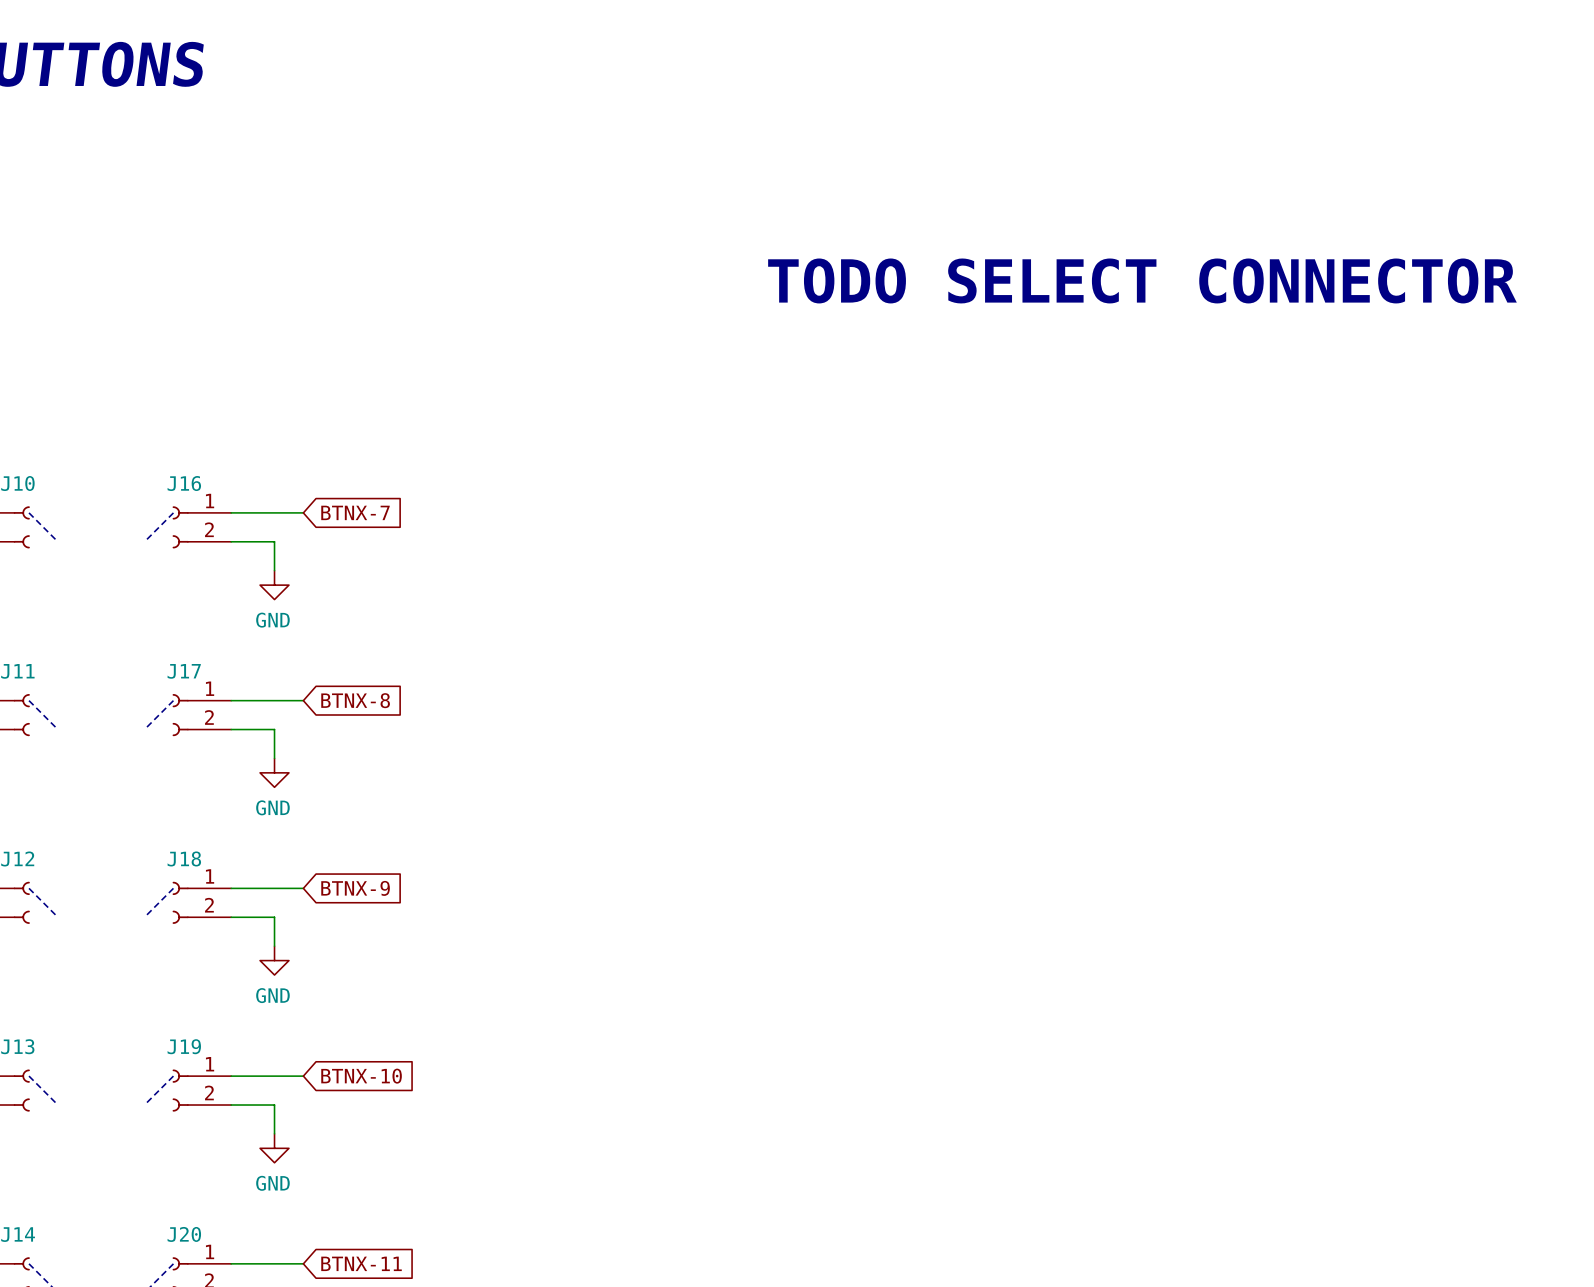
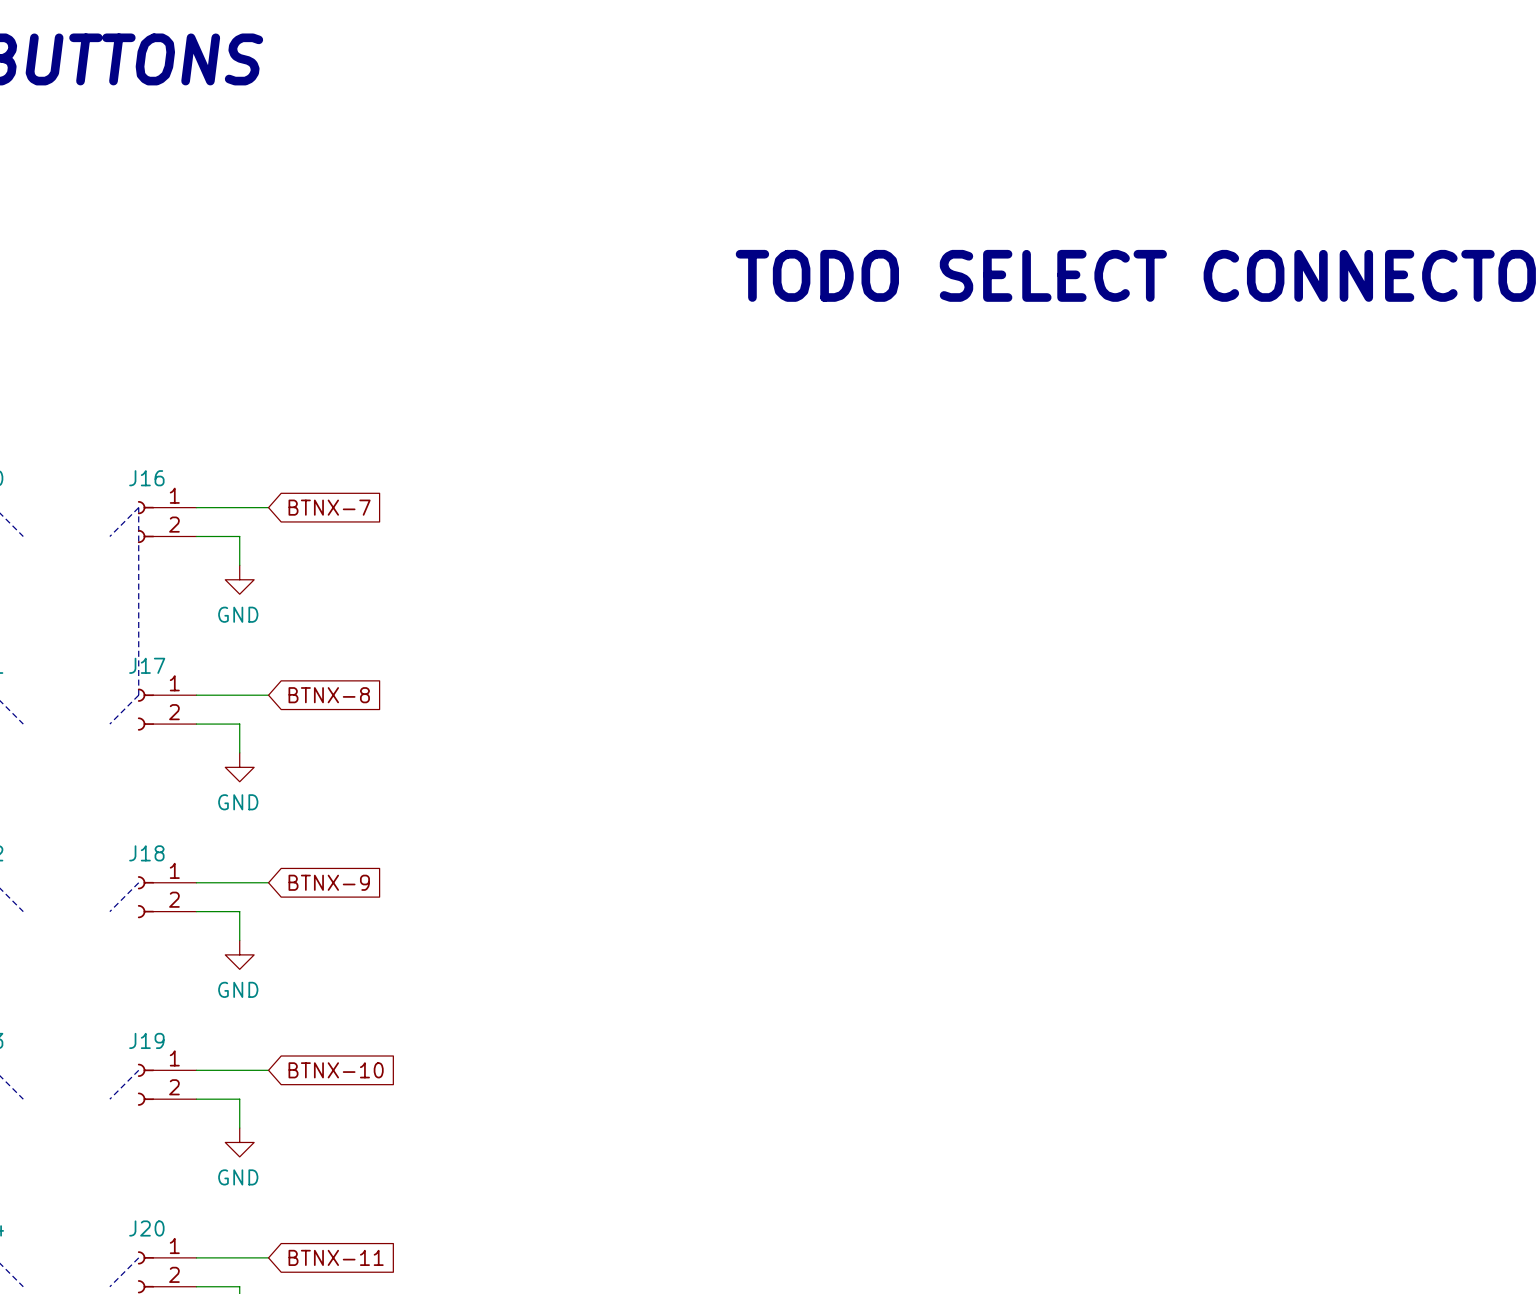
line: none -> (138, 507) (138, 695)

